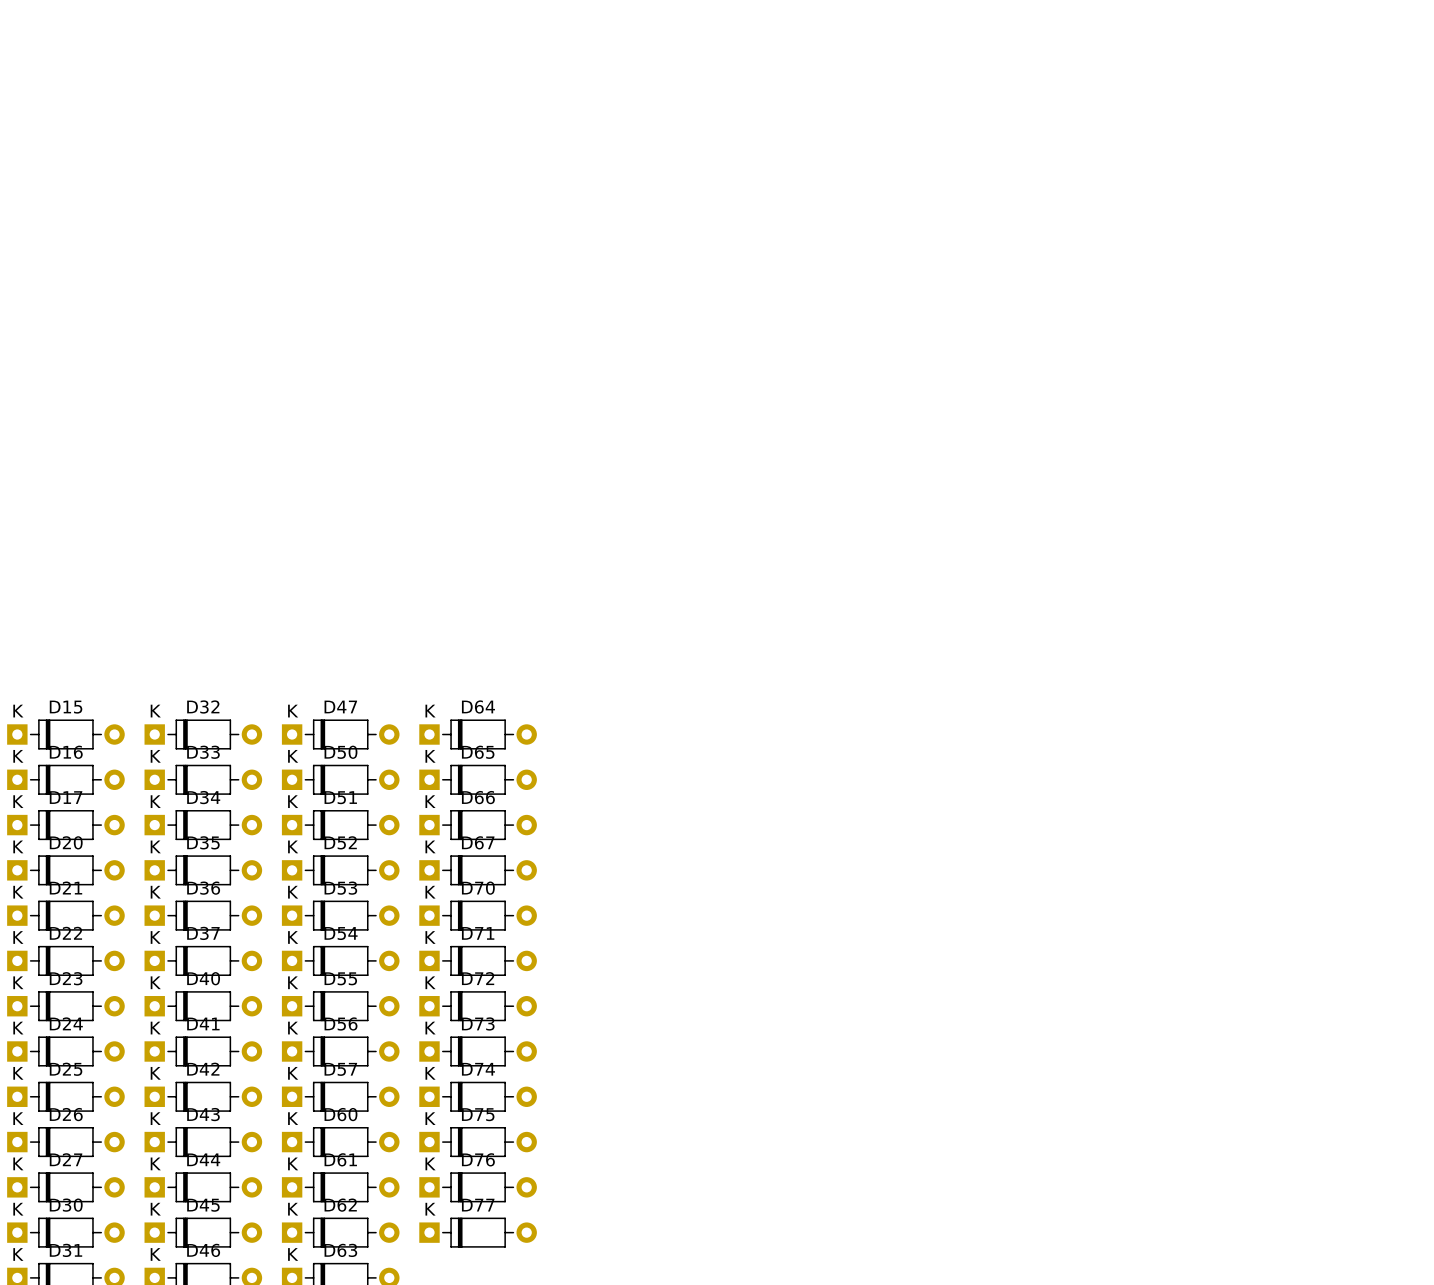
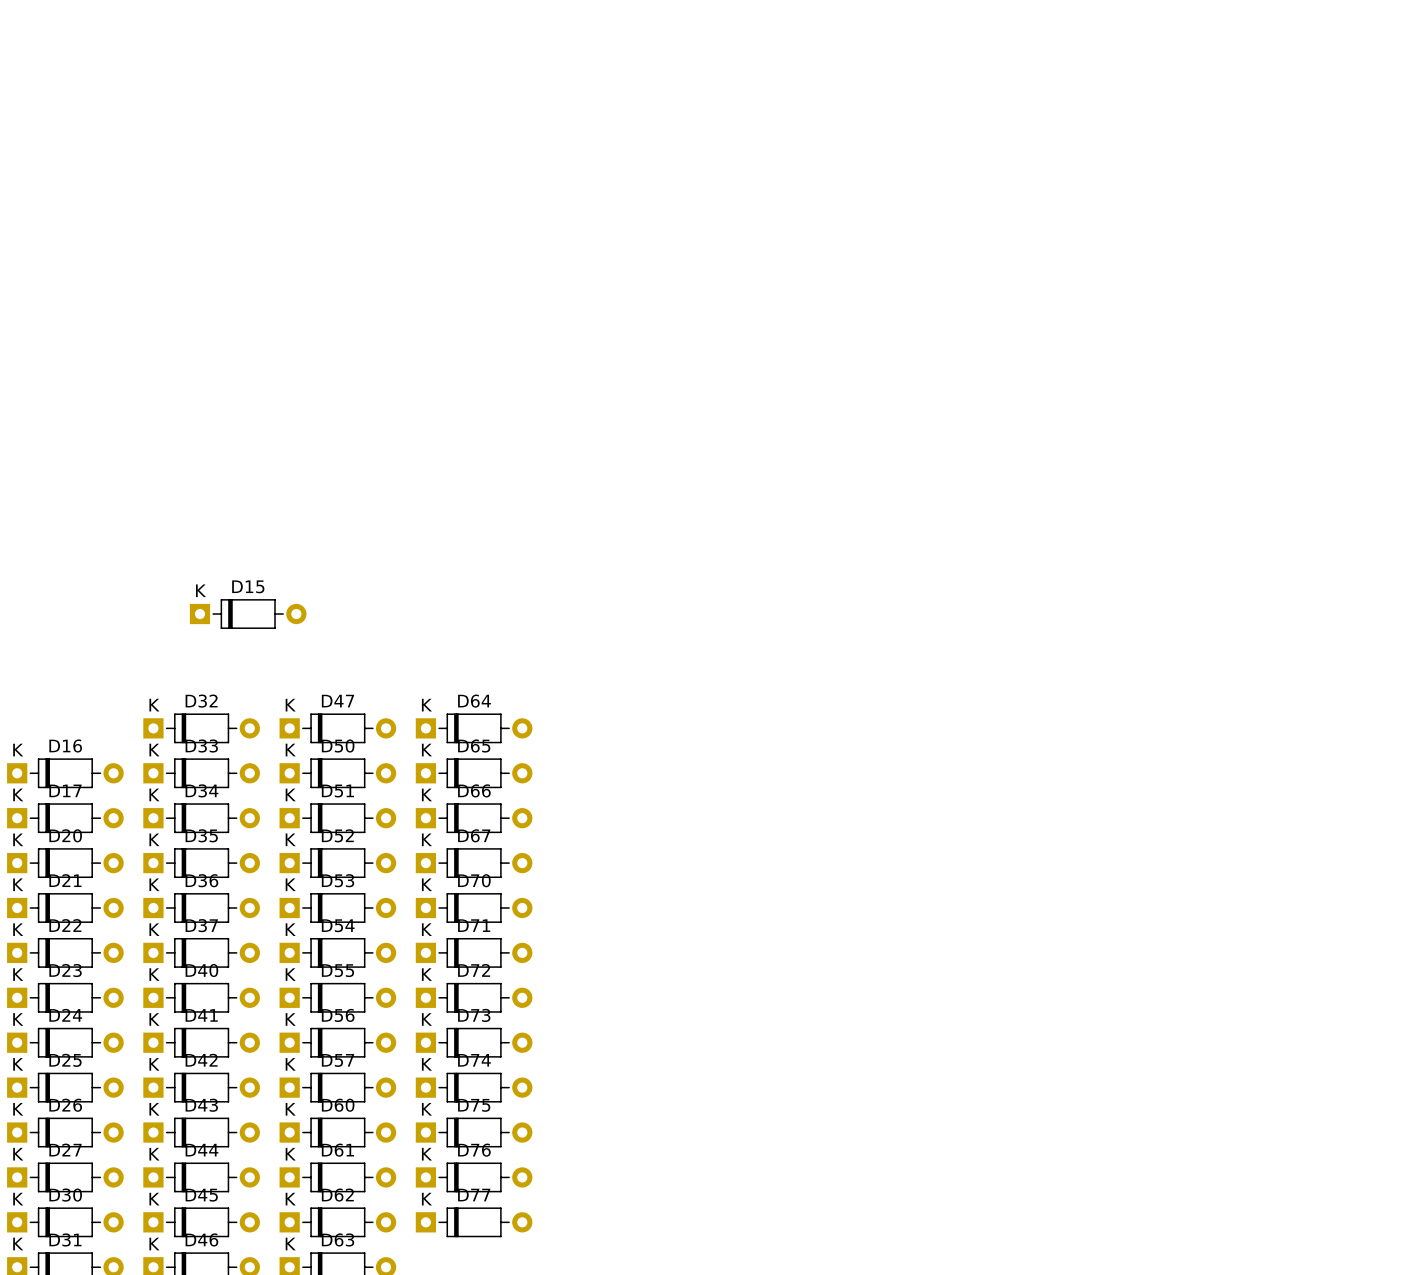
D15 position: (65, 734) -> (248, 614)

